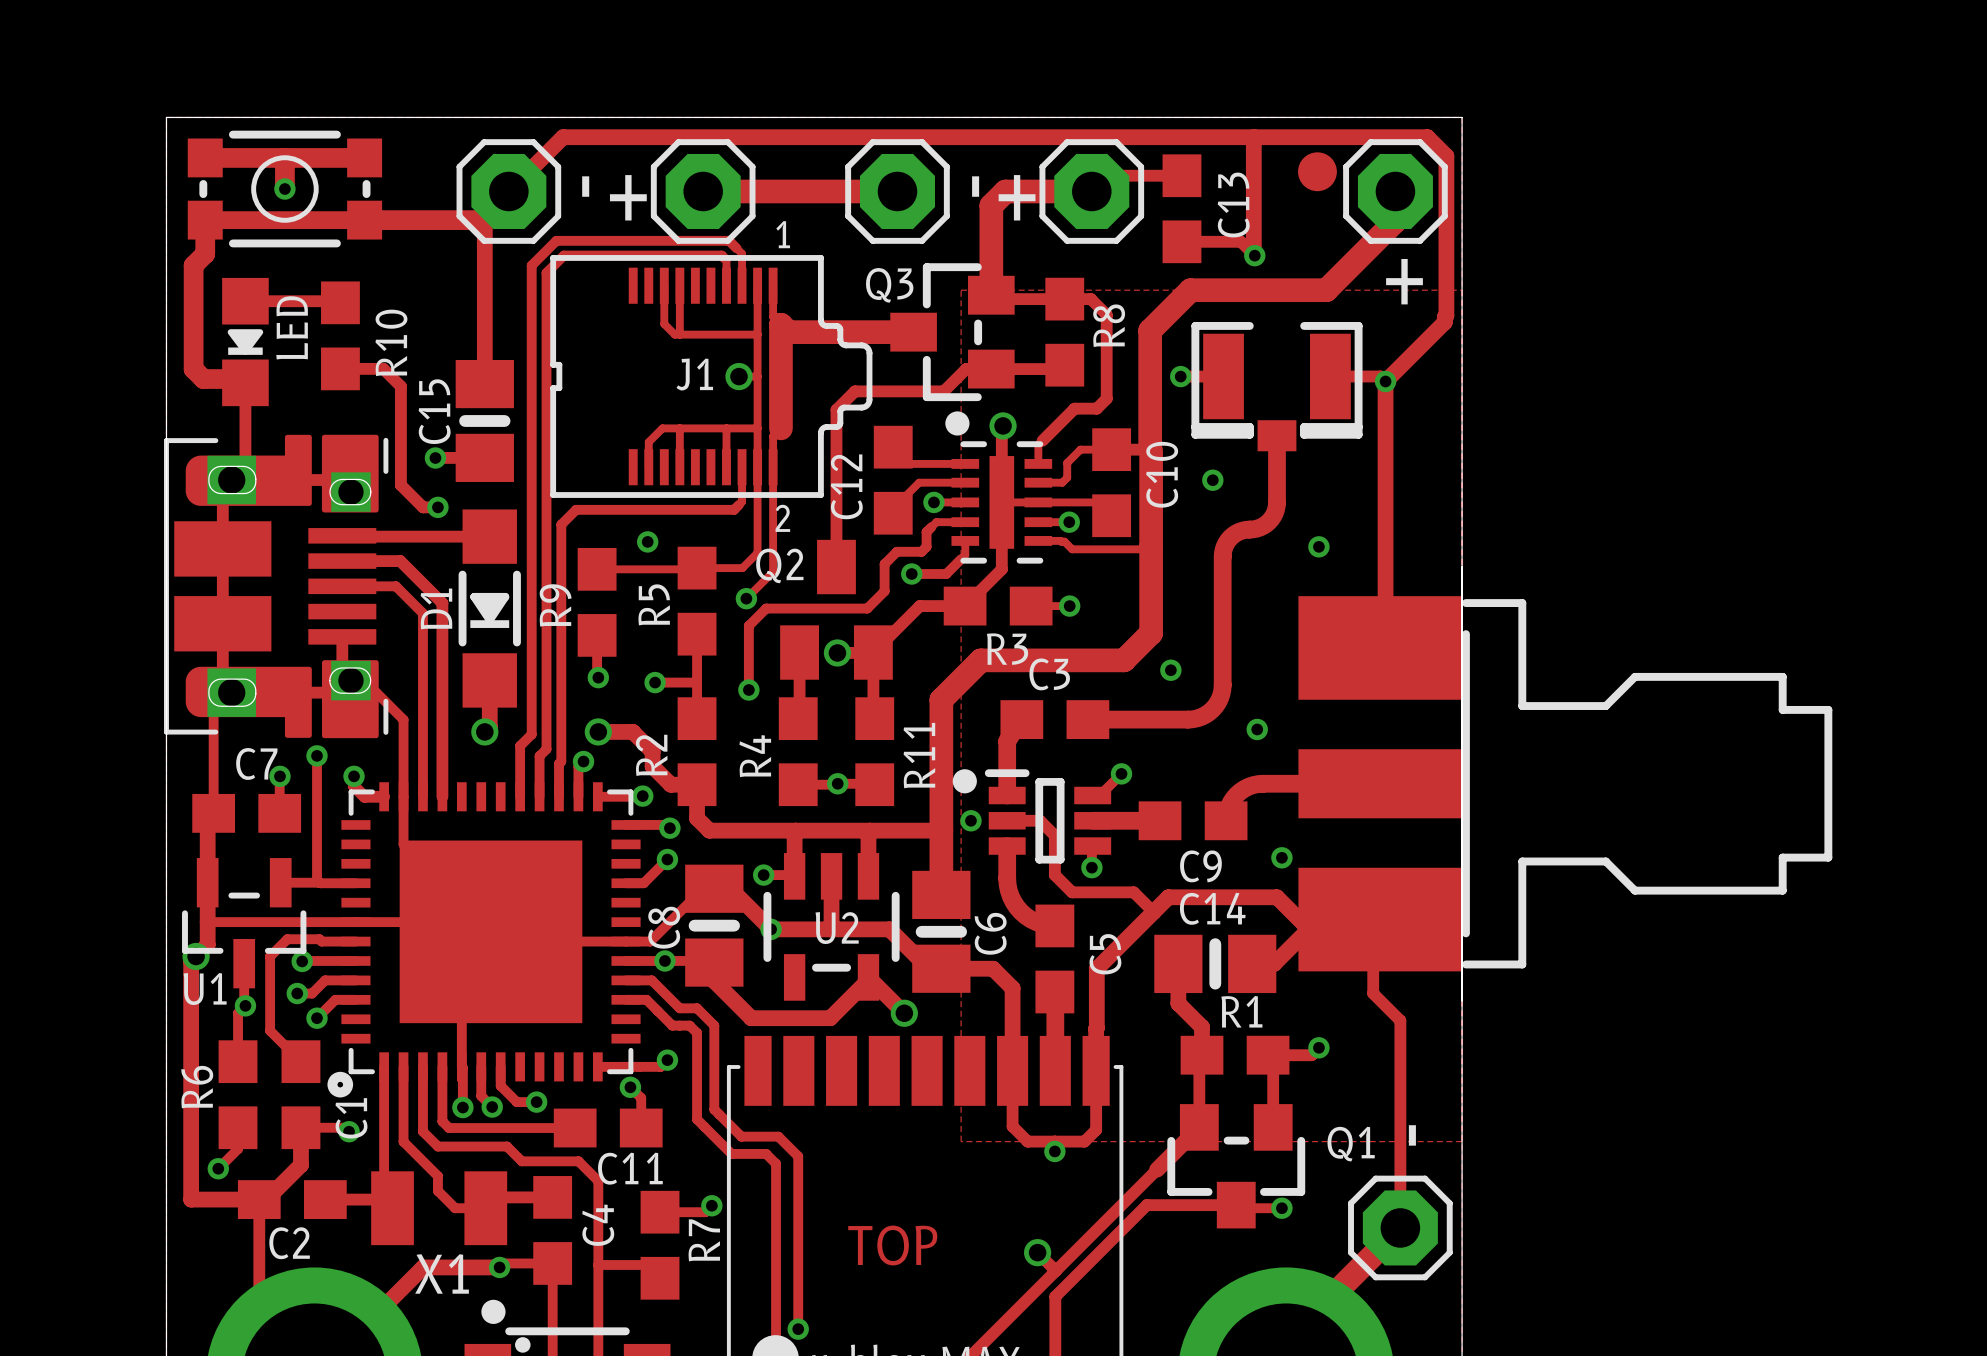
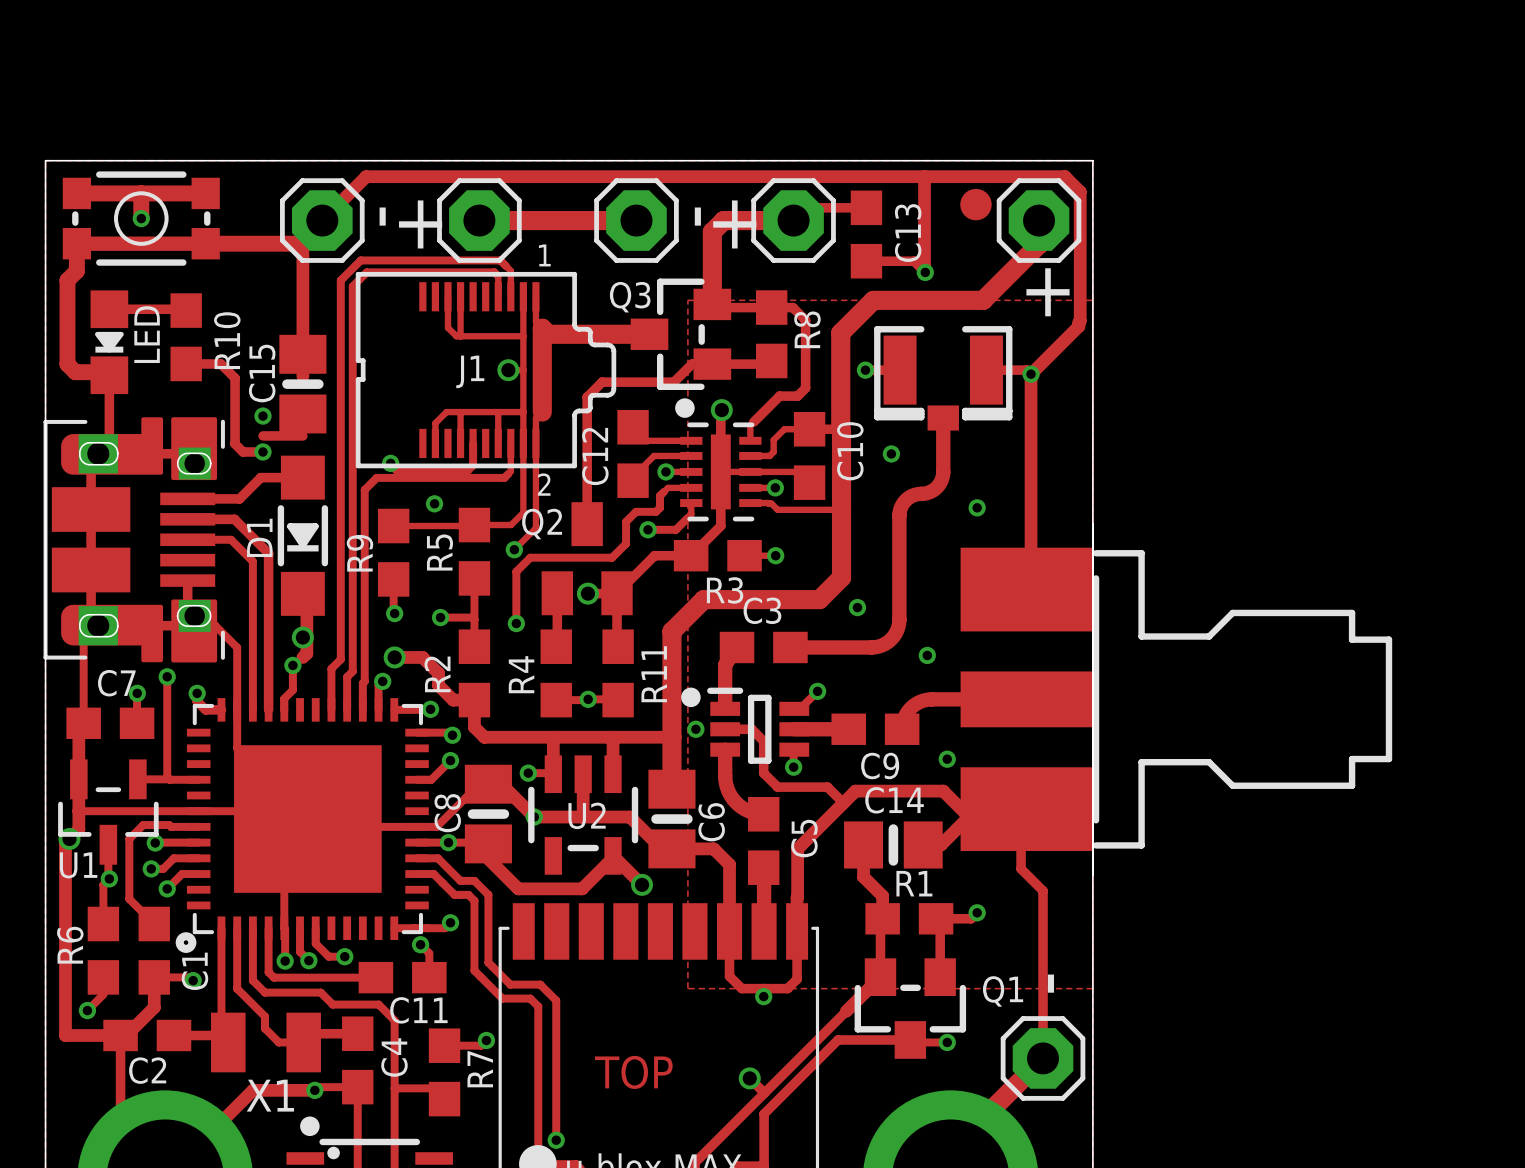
C15 position: (484, 420) -> (302, 384)
via: none -> (262, 416)
via position: (435, 458) -> (262, 451)
track: (400, 467) (400, 485) (423, 507) (437, 507) -> (235, 443) (243, 451) (262, 451)
track: none -> (473, 443) (473, 465) (468, 469) (396, 469) (390, 463)
via: none -> (390, 463)
via: (437, 507) -> none
track: (342, 535) (489, 536) -> (187, 498) (239, 498) (260, 477) (302, 477)
D1 position: (489, 608) -> (302, 535)
via position: (484, 731) -> (302, 637)
track: none -> (292, 665) (292, 690) (284, 698) (284, 709)
via: none -> (292, 665)

